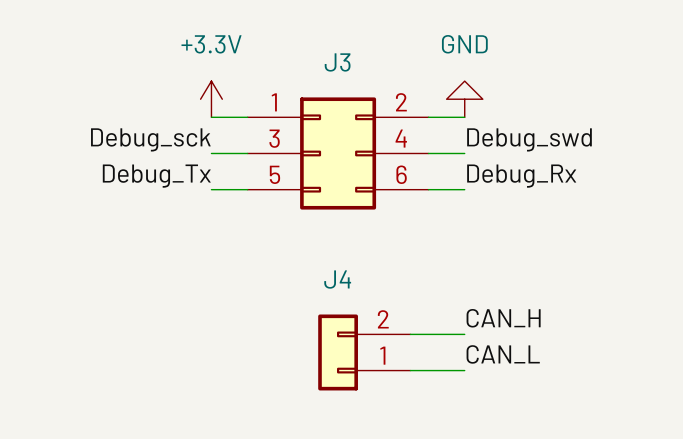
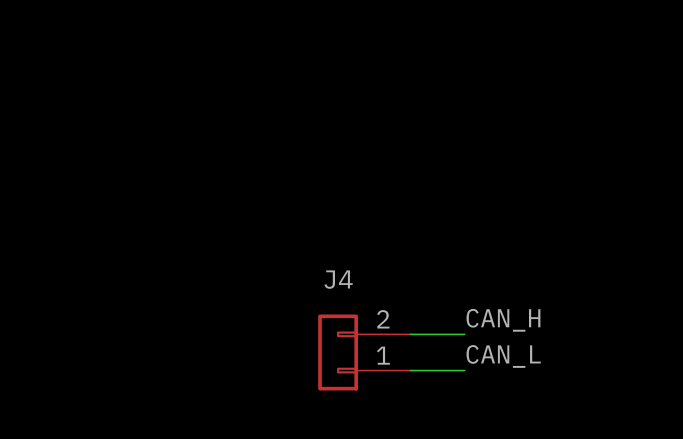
power symbol: +3.3V (211, 99) -> none
power symbol: GND (464, 99) -> none
wire: (211, 117) (247, 117) -> none
wire: (428, 117) (464, 117) -> none
label: Debug_sck (150, 139) -> none
label: Debug_swd (529, 139) -> none
wire: (211, 153) (247, 153) -> none
J3: (338, 153) -> none
wire: (428, 153) (464, 153) -> none
label: Debug_Tx (156, 176) -> none
label: Debug_Rx (521, 176) -> none
wire: (211, 189) (247, 189) -> none
wire: (428, 189) (464, 189) -> none

